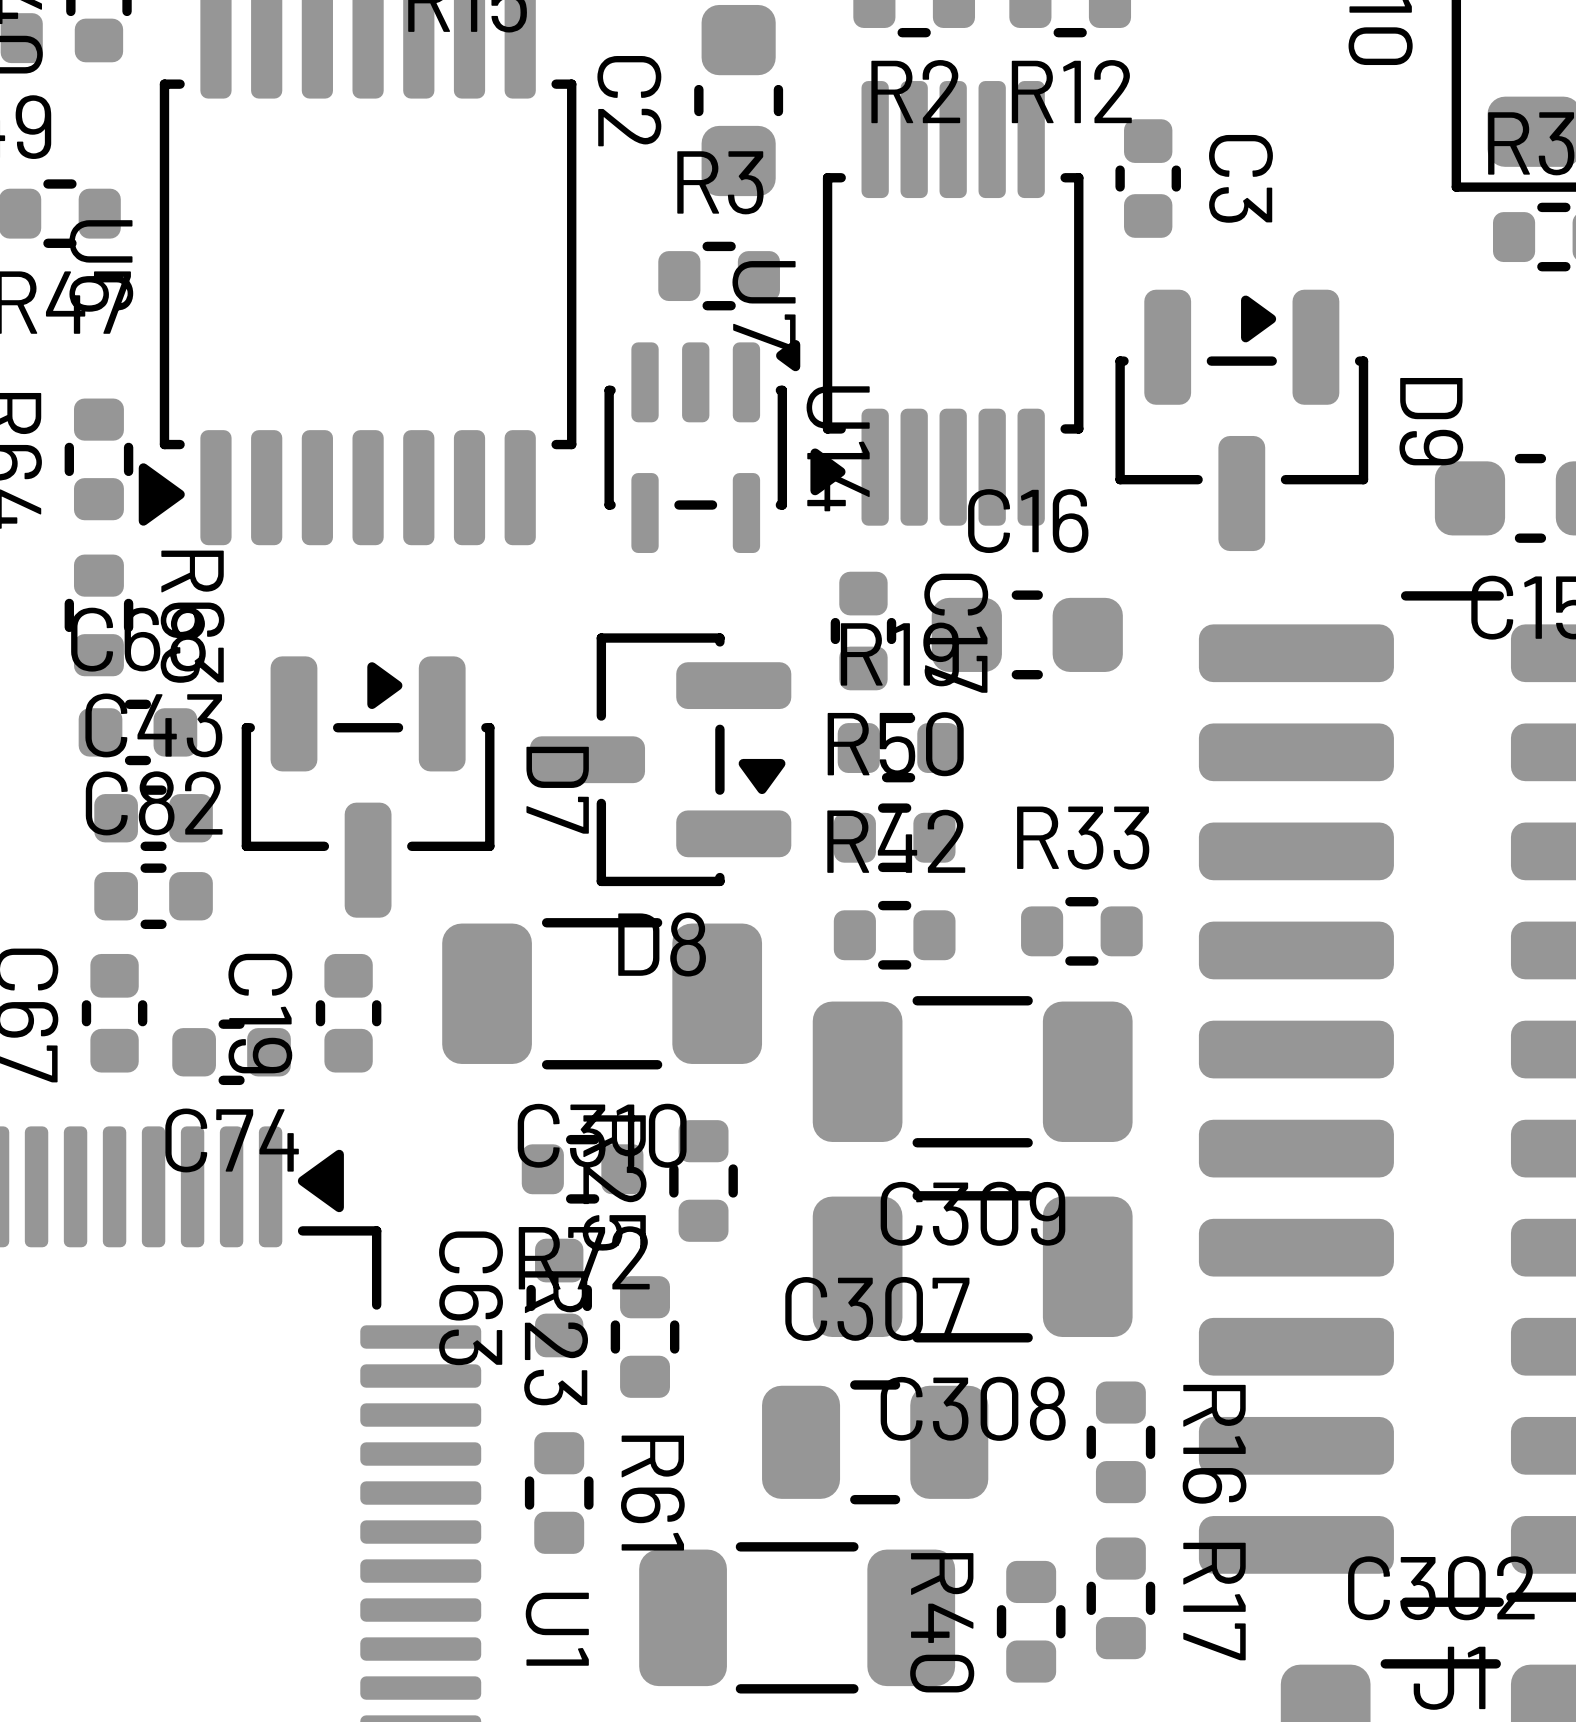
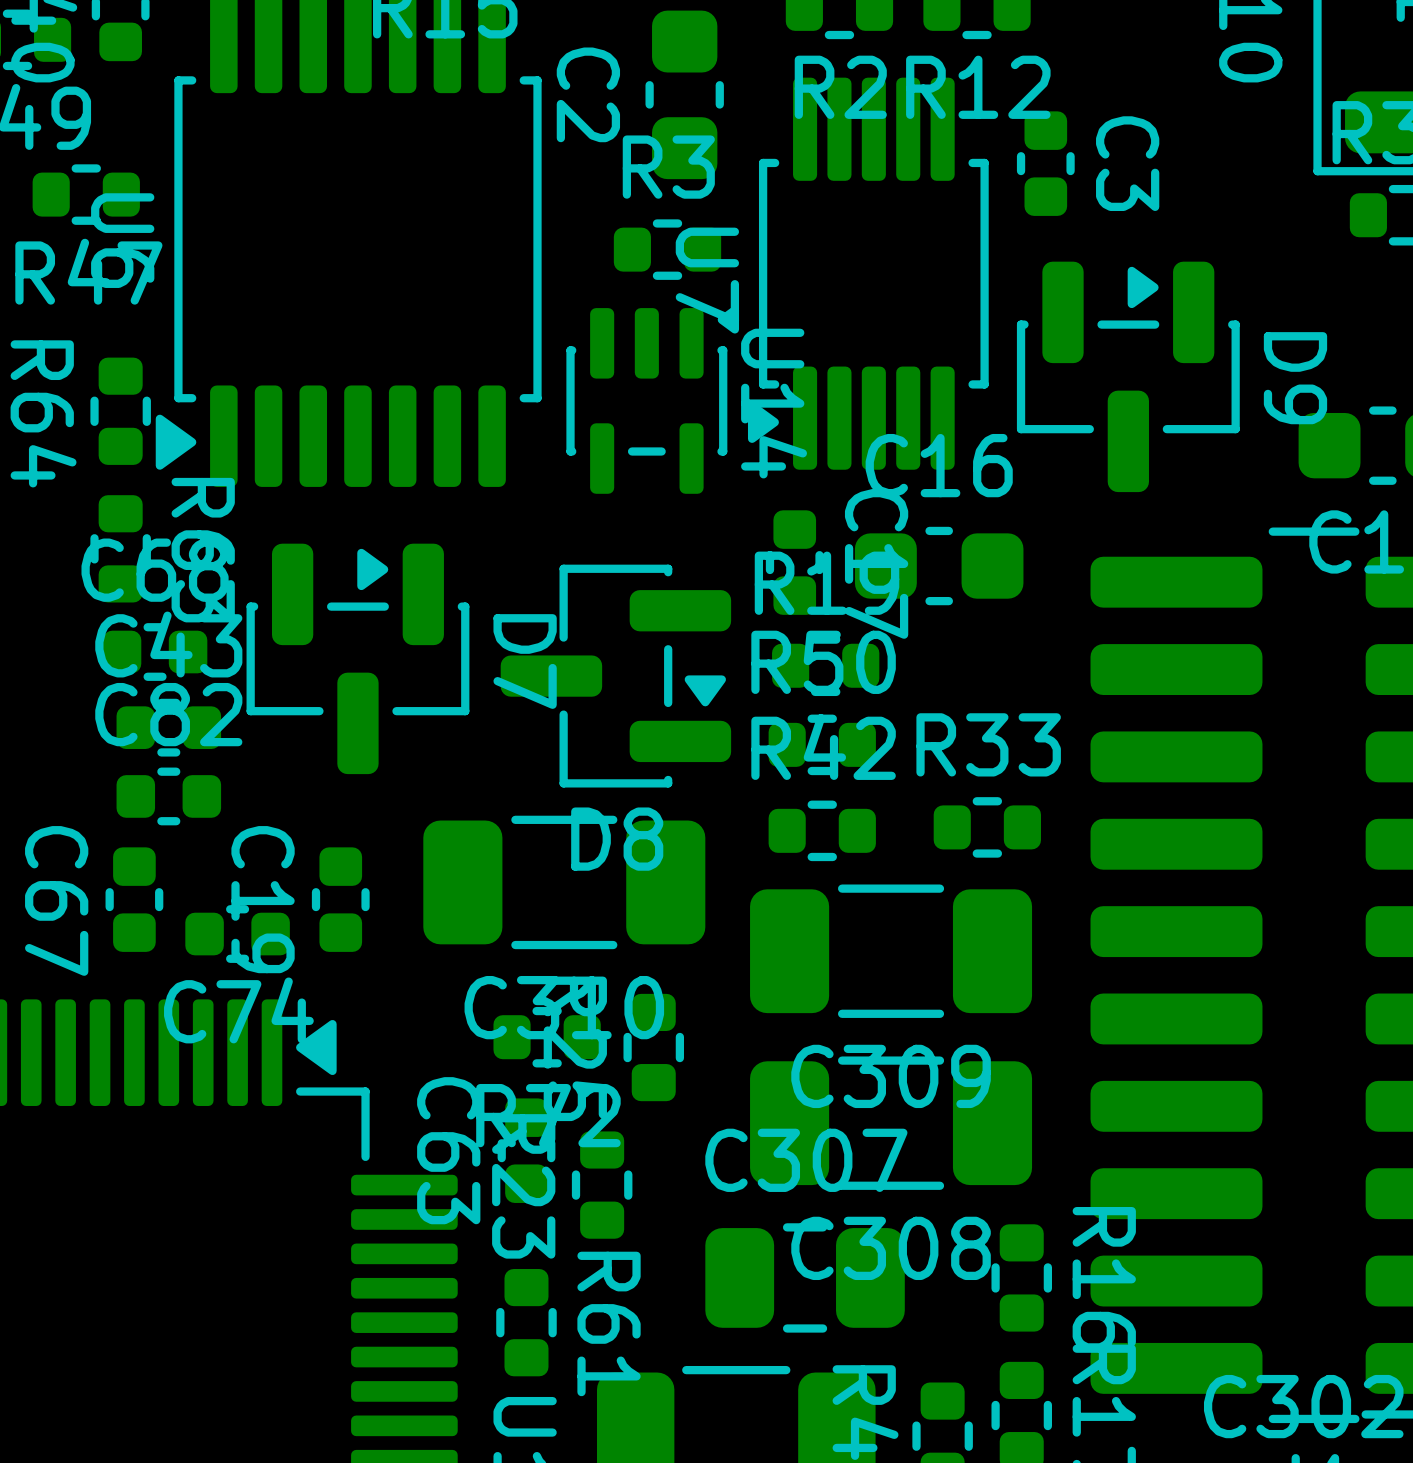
D7 position: (368, 787) -> (357, 658)

